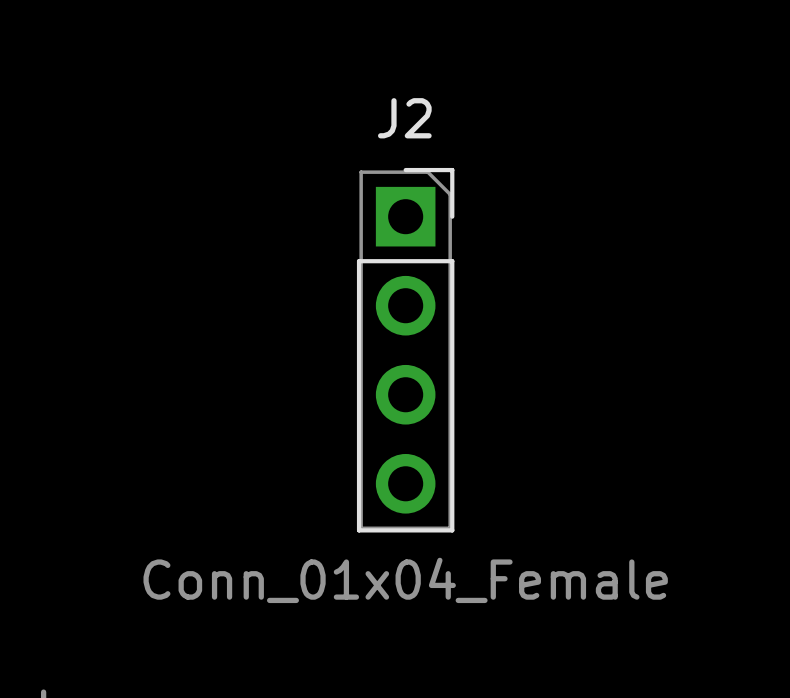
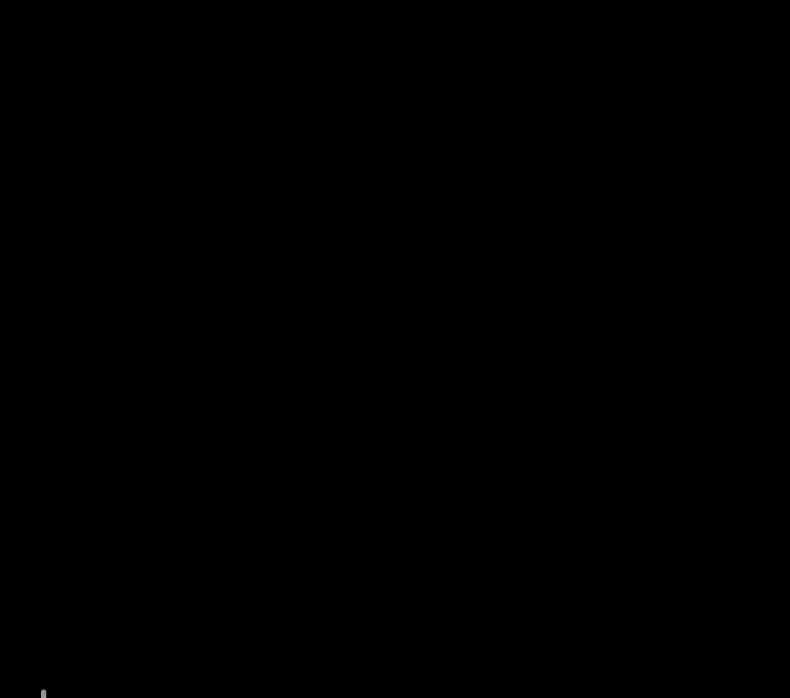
J2: Conn_01x04_Female (405, 350) -> none

